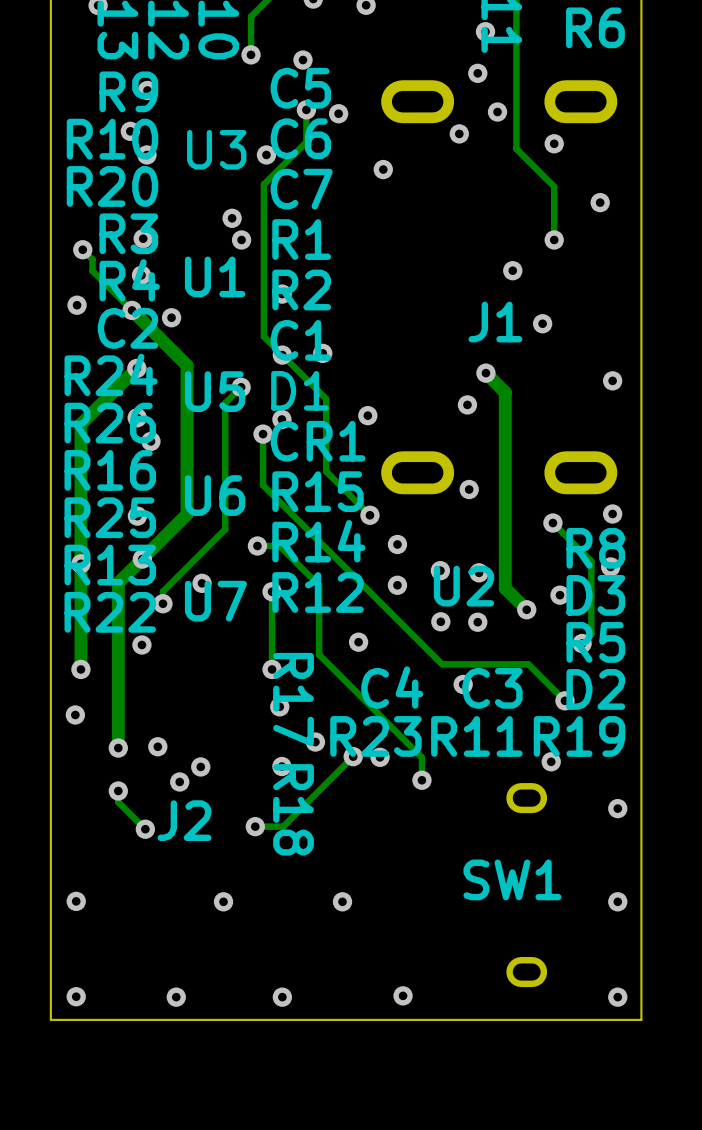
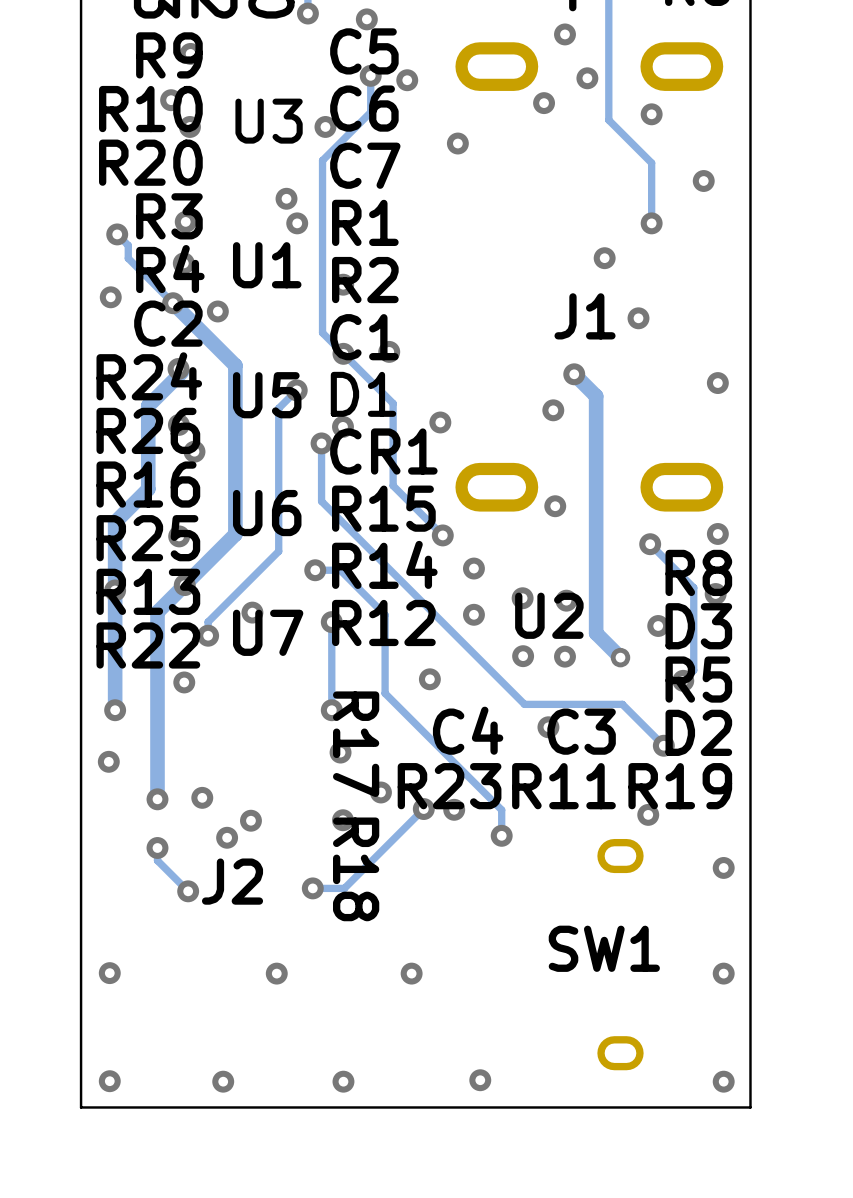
track: (136, 368) (80, 424) (80, 503) -> (181, 372) (148, 405) (148, 489) (115, 522)
track: (505, 588) (526, 609) -> (596, 618) (596, 633) (620, 657)
via position: (526, 609) -> (620, 657)

